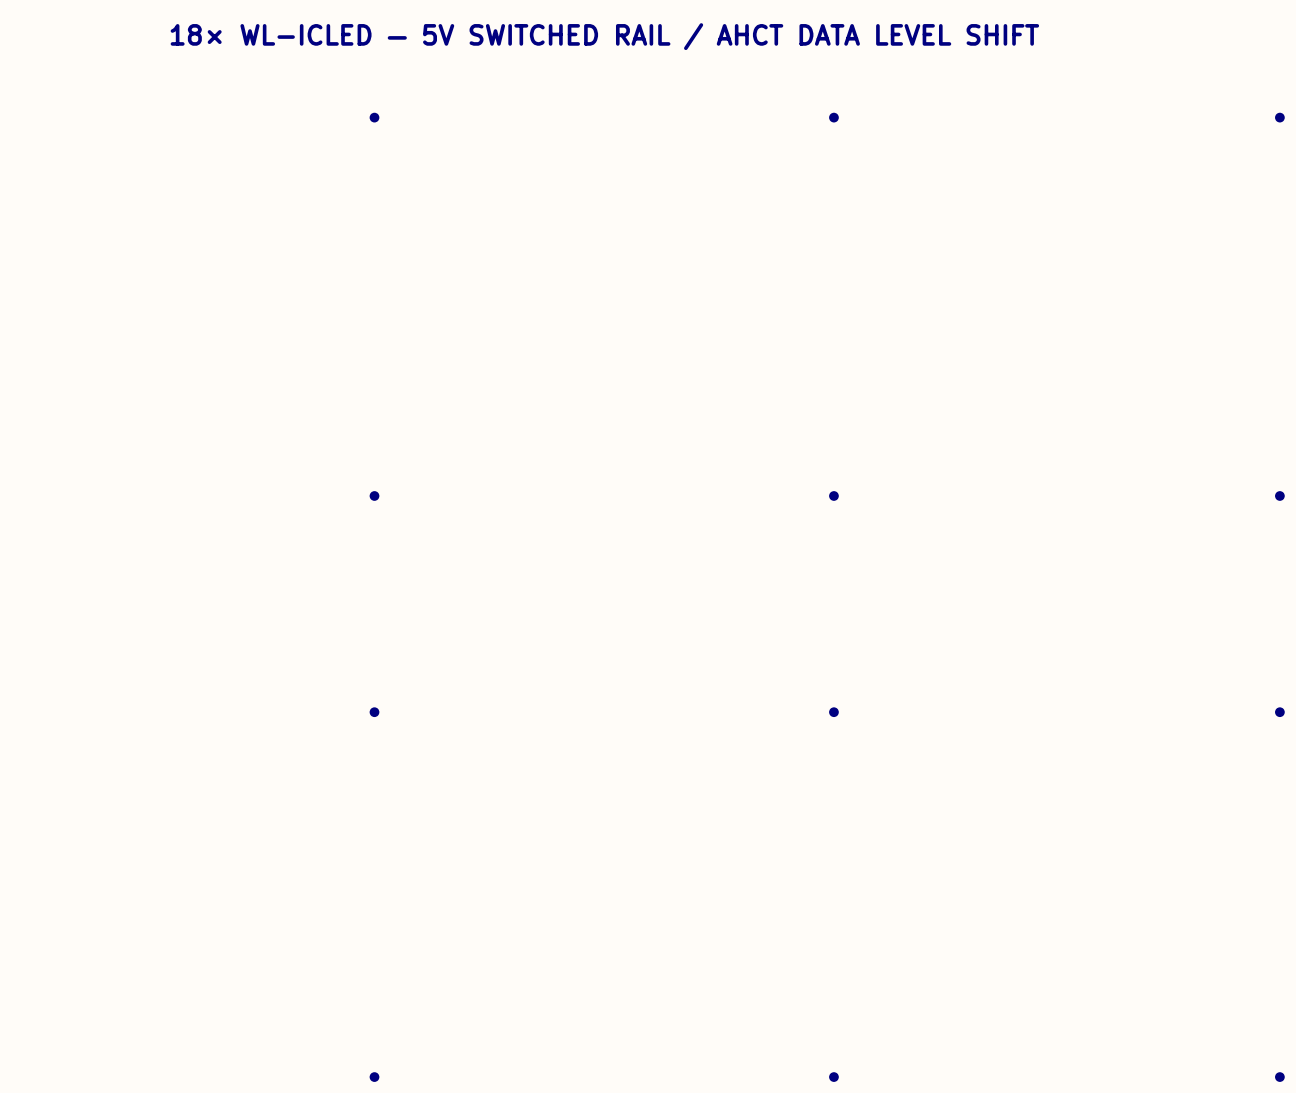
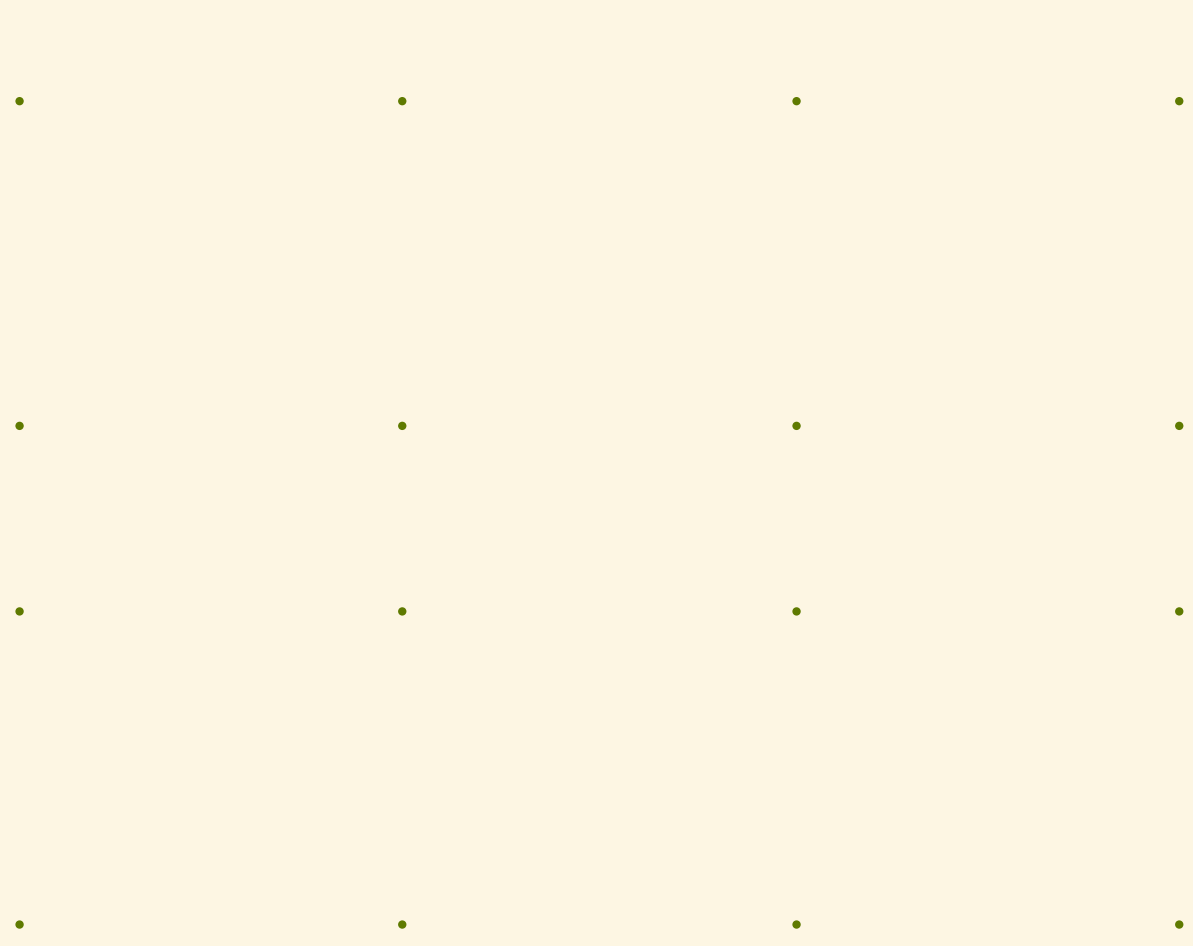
text: 18× WL-ICLED — 5V SWITCHED RAIL / AHCT DATA LEVEL SHIFT (604, 36) -> none

